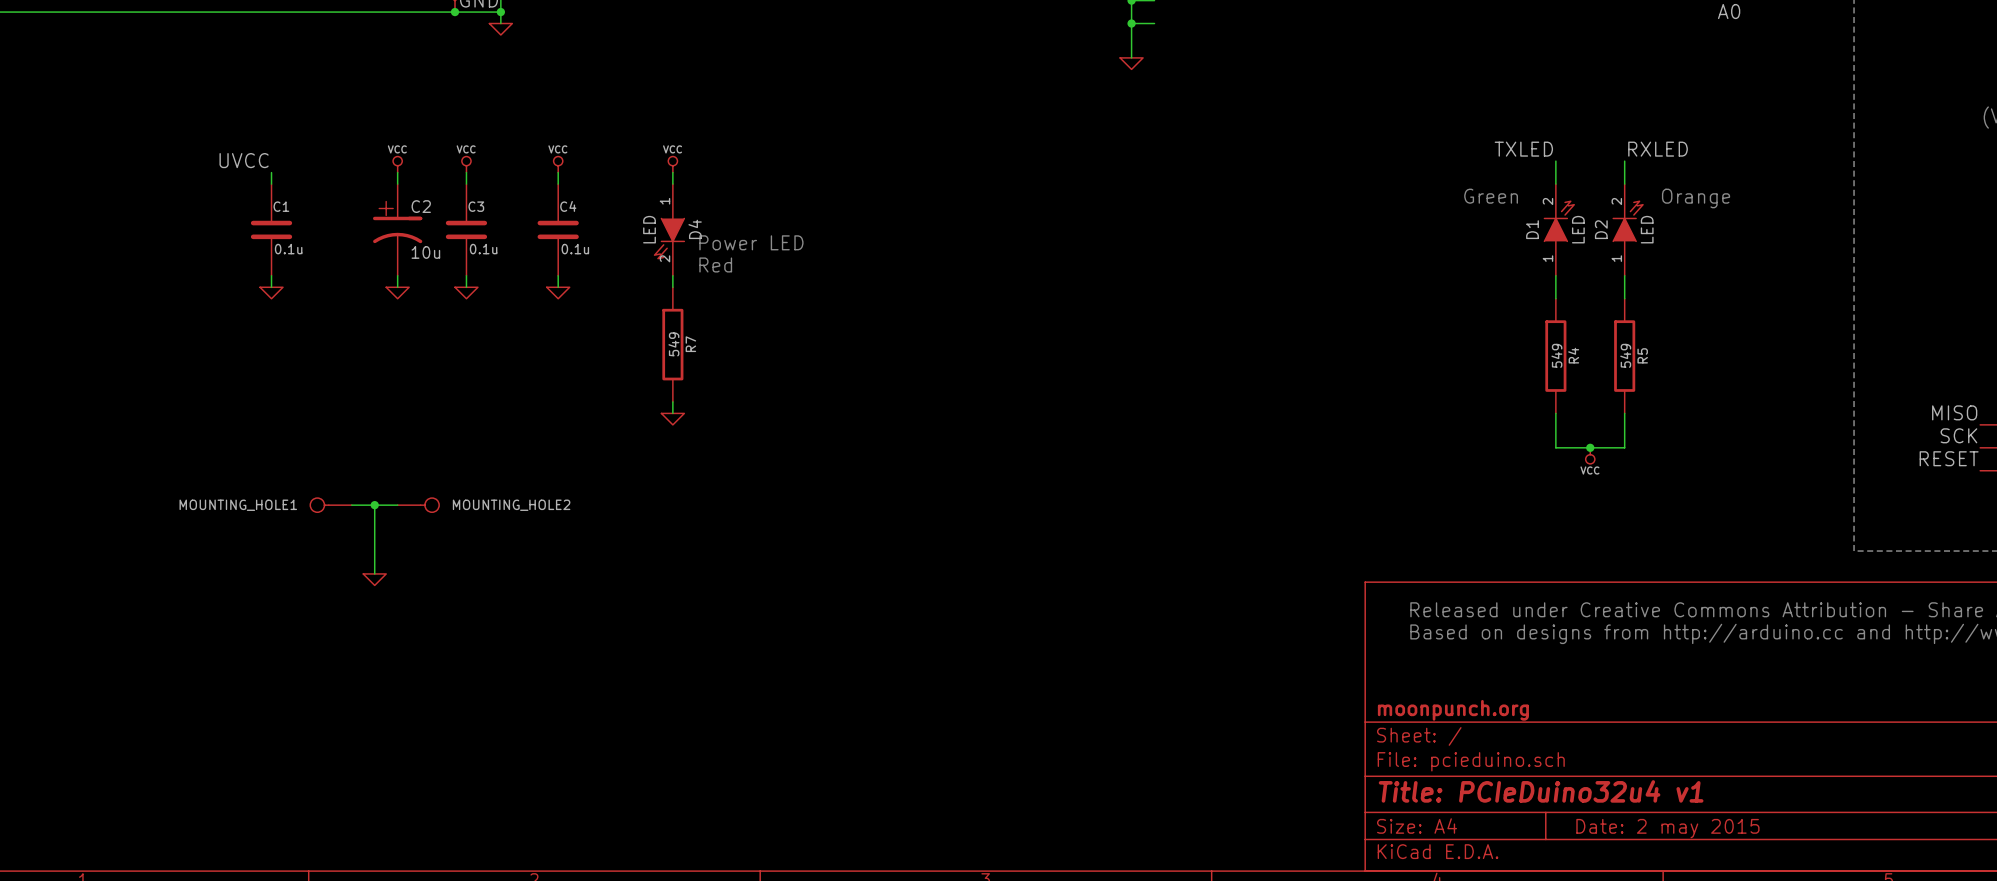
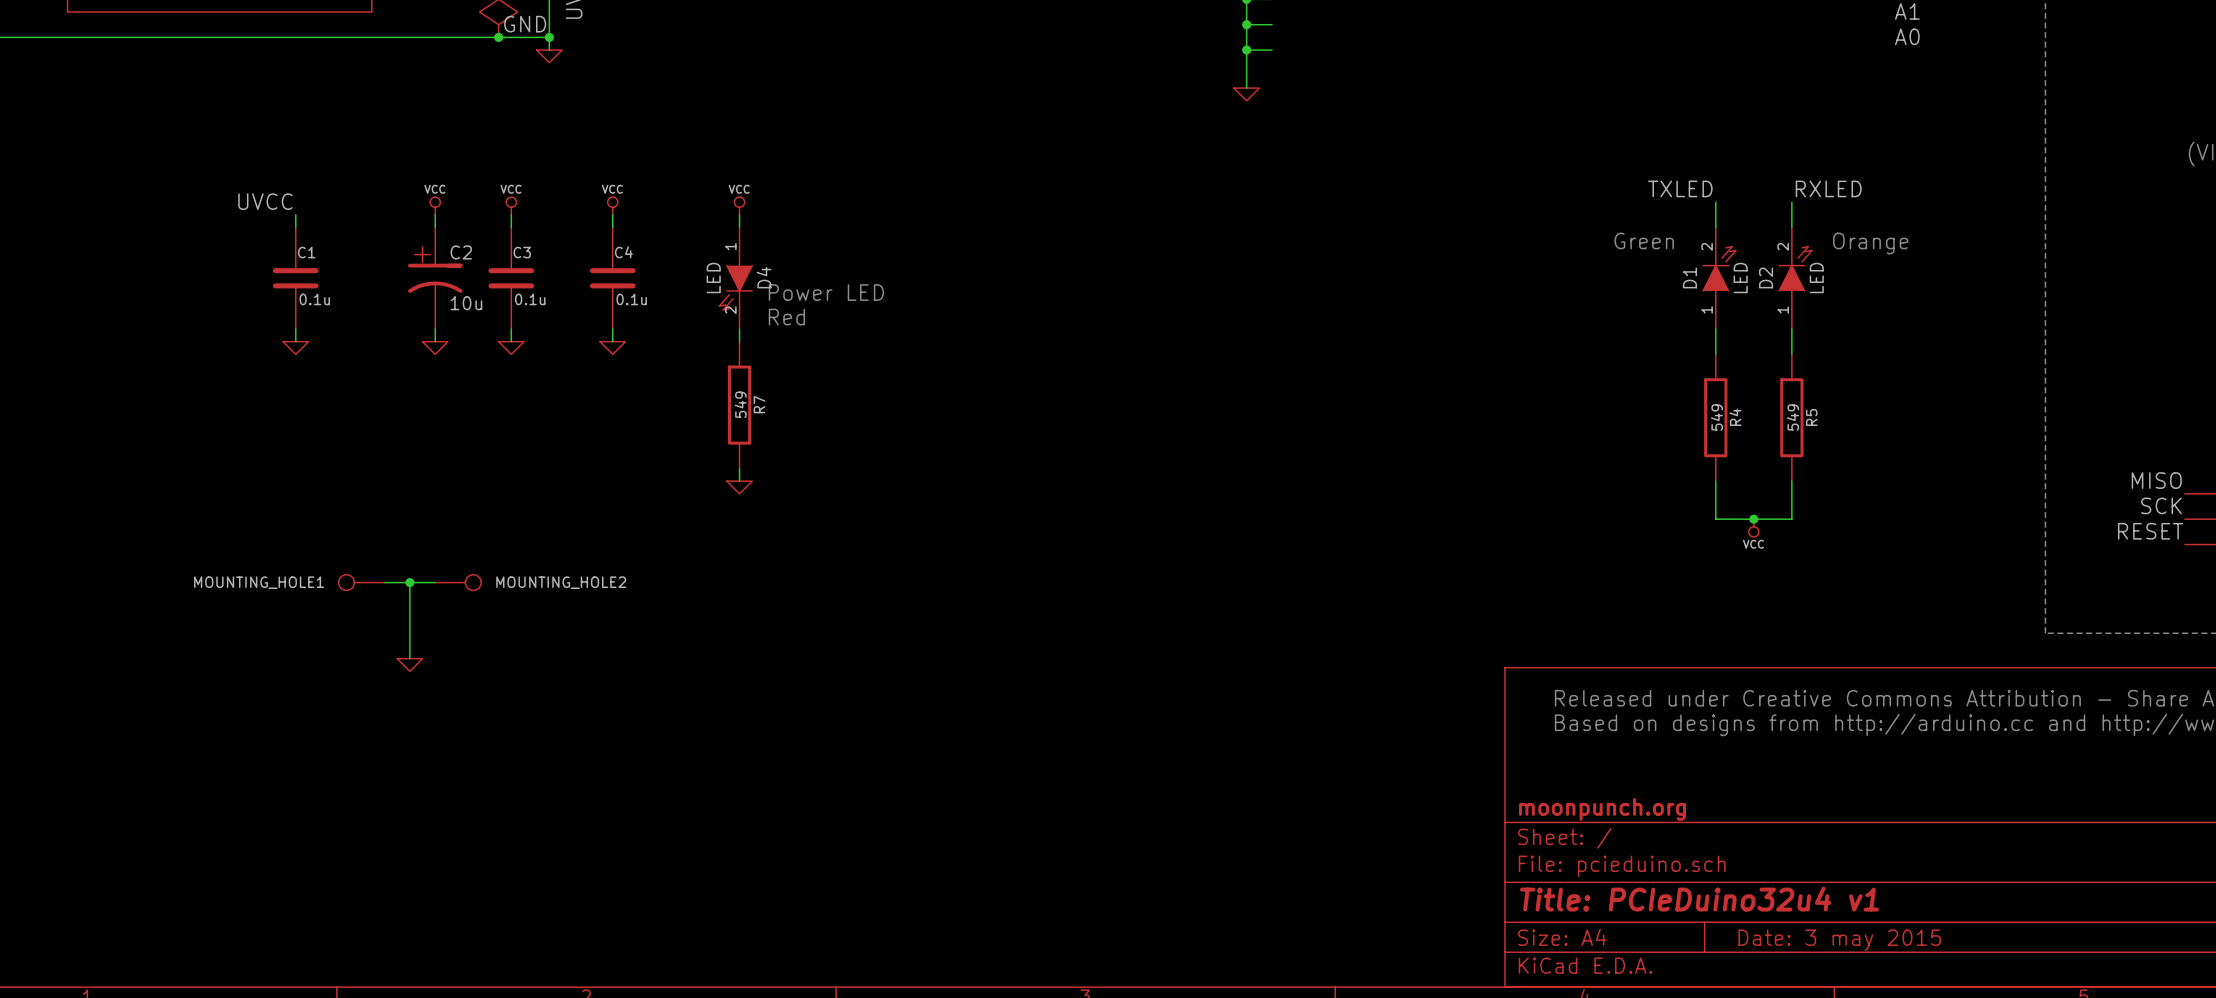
title block: Date: 2 may 2015 (1667, 828) -> Date: 3 may 2015 (1839, 940)

